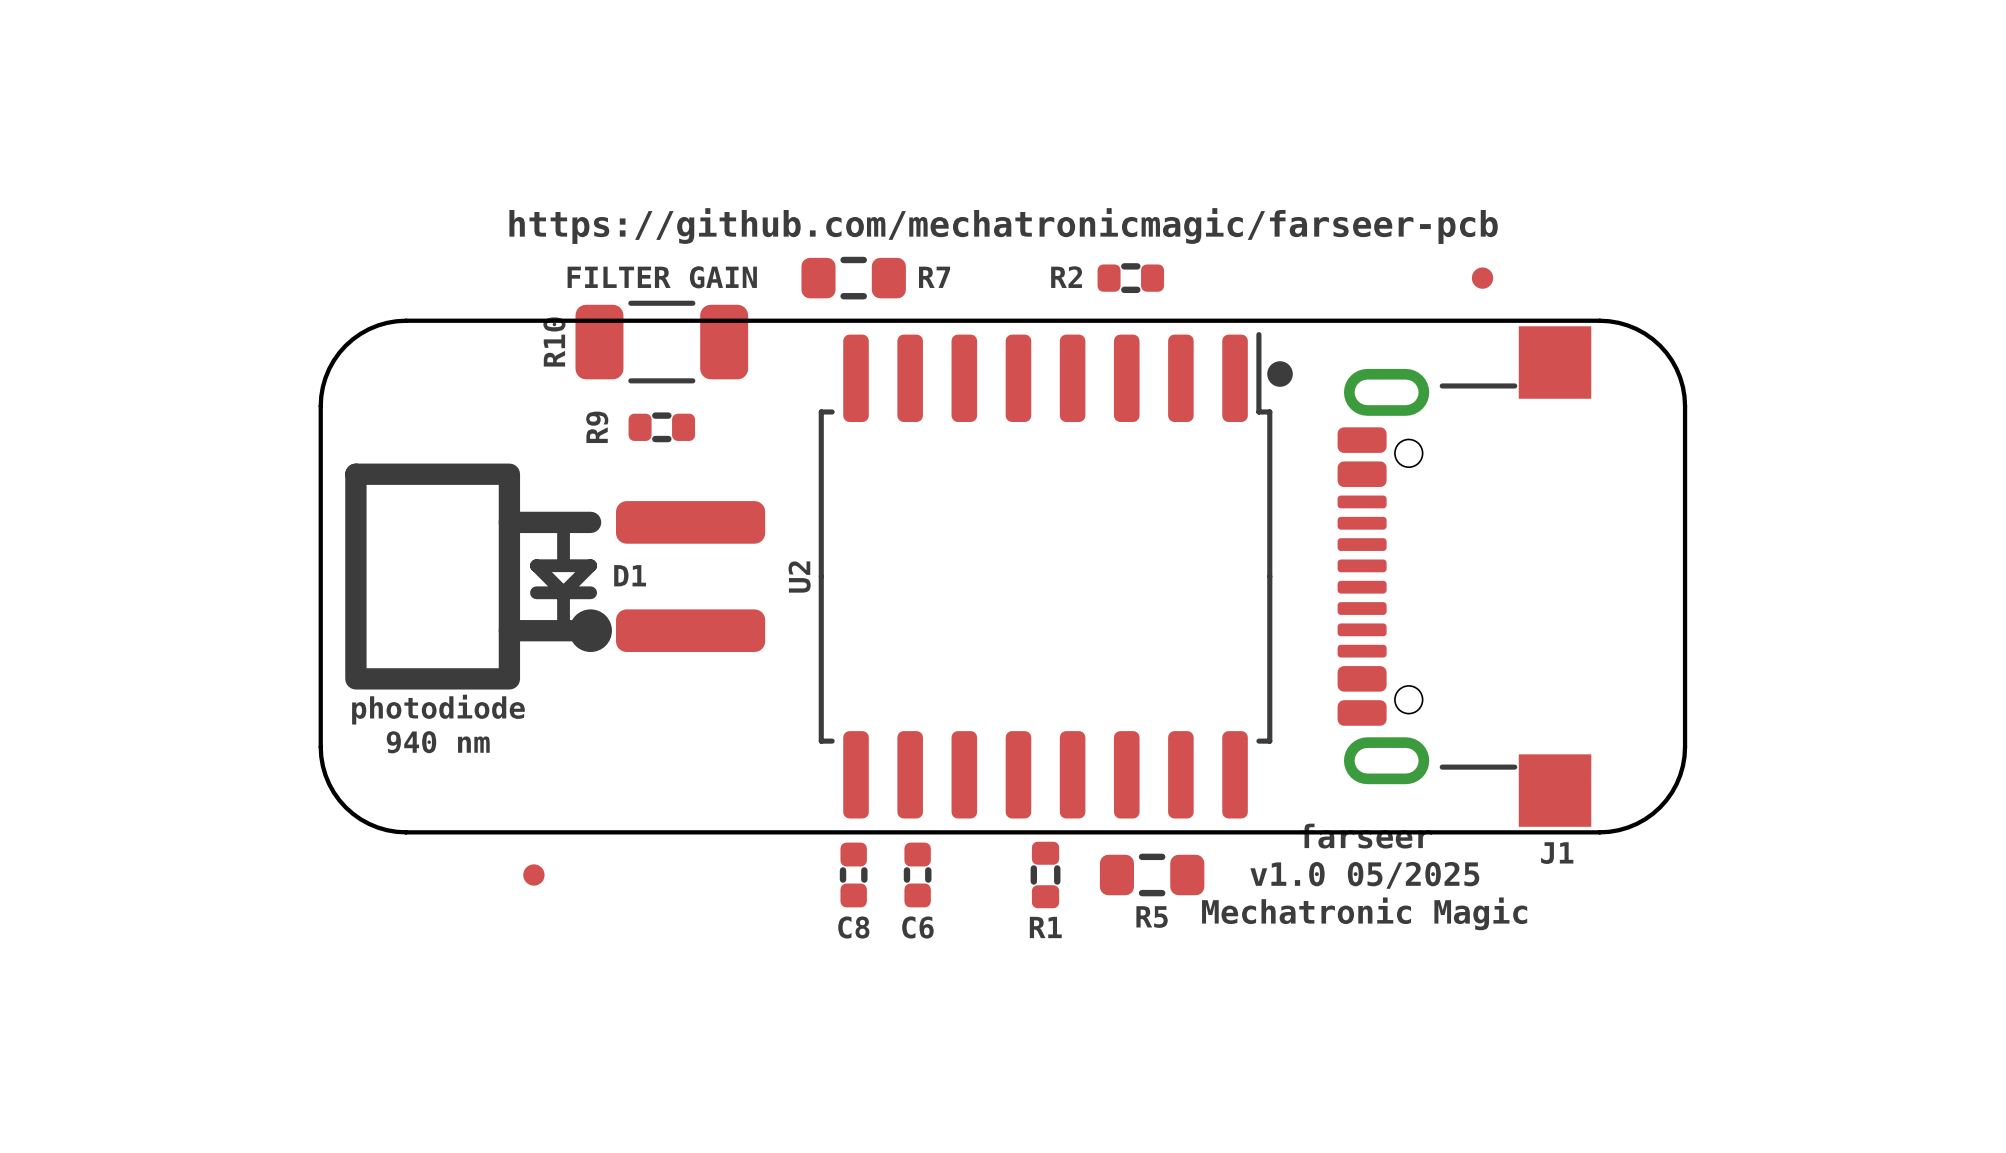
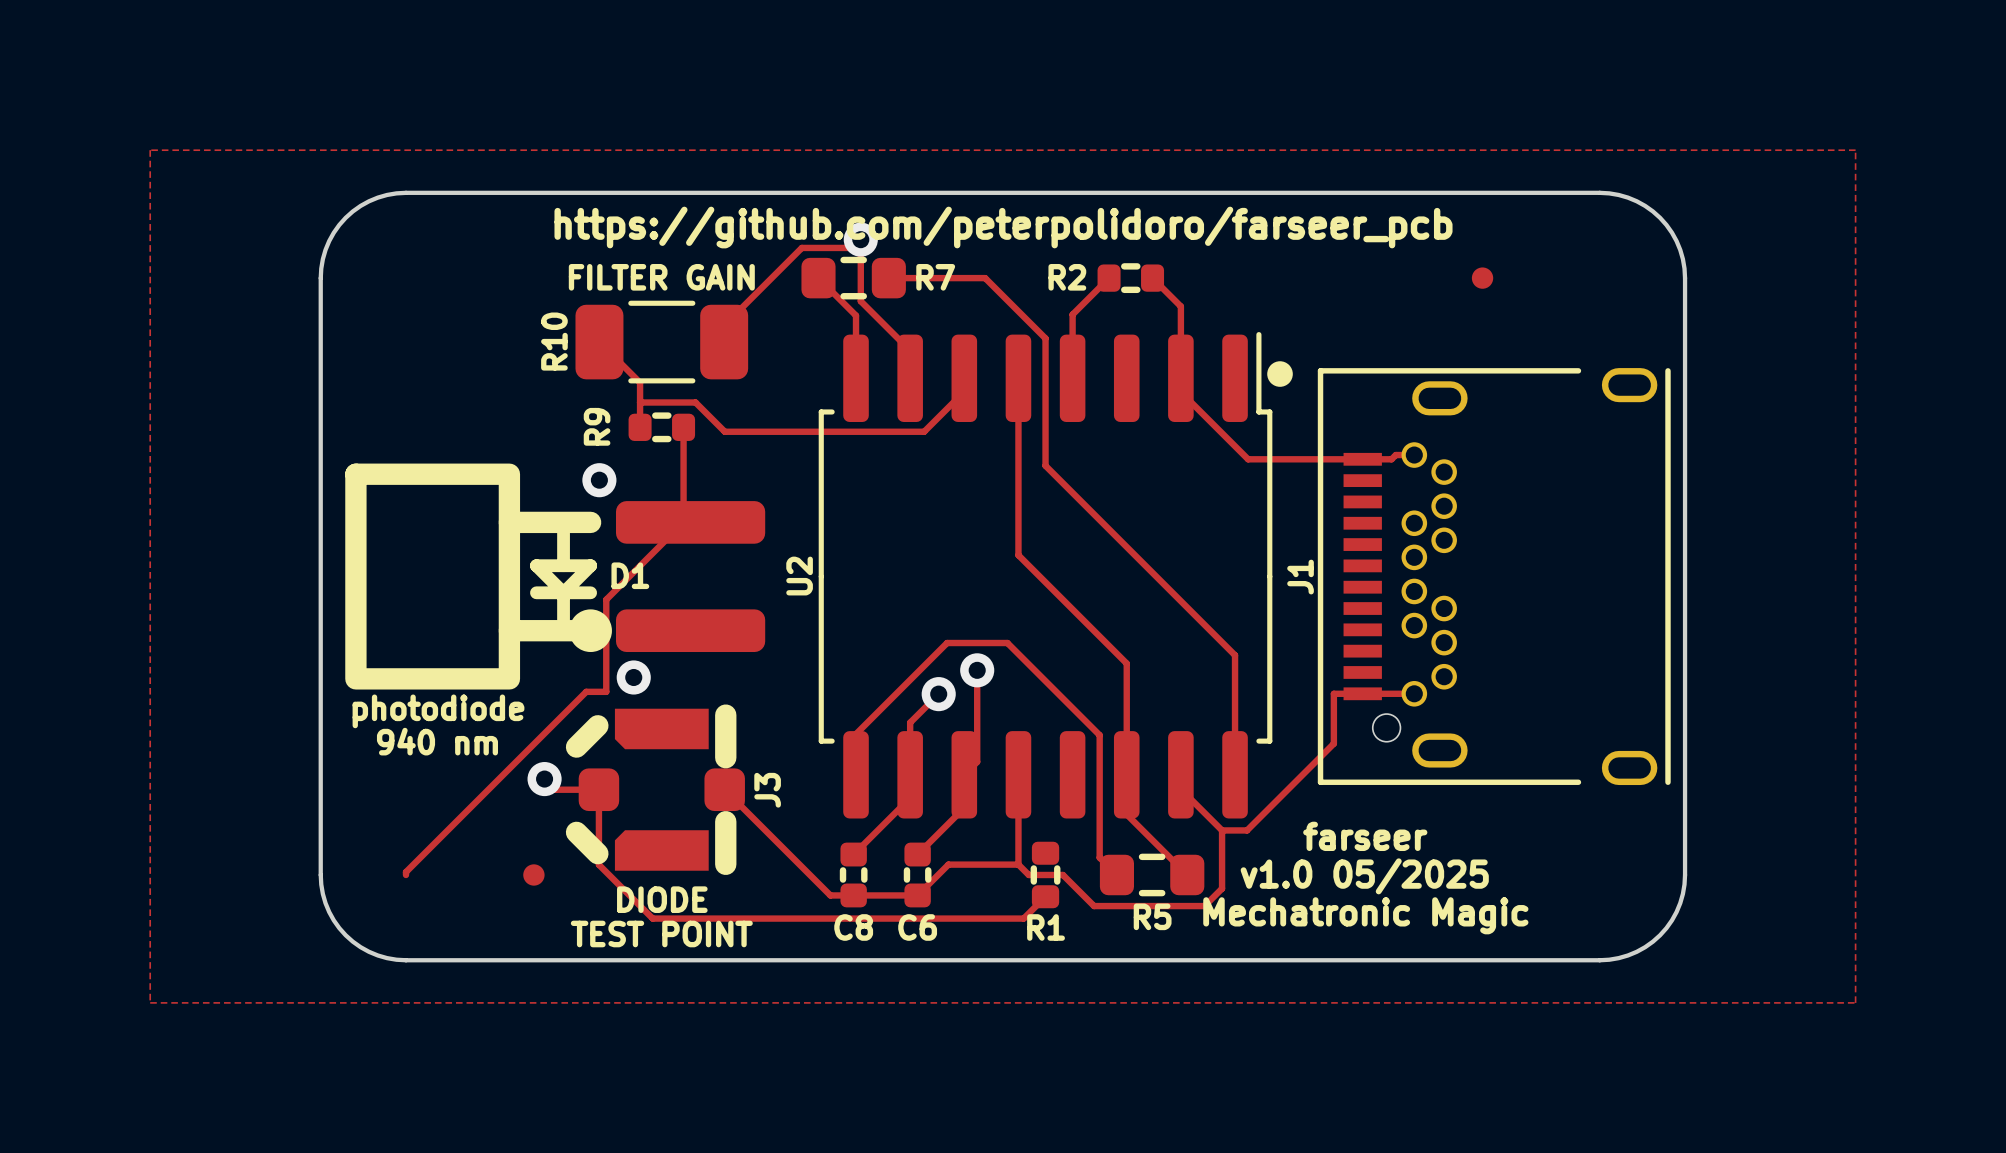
zone outline: none -> (150, 150) (150, 1002) (1855, 1002) (1855, 150) (150, 150)
text: https://github.com/mechatronicmagic/farseer-pcb (1003, 226) -> https://github.com/peterpolidoro/farseer_pcb (1003, 227)
track: none -> (860, 239) (860, 301) (910, 350) (910, 378)
via: none -> (860, 239)
track: none -> (860, 247) (801, 247) (724, 325) (724, 342)
track: none -> (818, 278) (856, 315) (856, 378)
track: none -> (888, 278) (985, 278) (1045, 338) (1045, 465) (1235, 655) (1235, 774)
track: none -> (1109, 278) (1072, 314) (1072, 378)
track: none -> (1152, 278) (1180, 306) (1180, 392) (1248, 459) (1391, 459) (1395, 455) (1414, 455)
J1 footprint: [1337, 326, 1592, 827] -> [1317, 368, 1671, 786]
track: none -> (599, 342) (640, 382) (640, 427)
track: none -> (964, 378) (964, 391) (924, 431) (724, 431) (695, 402) (640, 402)
track: none -> (1018, 378) (1018, 555) (1126, 663) (1126, 814) (1187, 874)
board edge: (320, 406) (325, 377) (333, 360) (345, 345) (369, 329) (387, 322) (406, 320) (1609, 321) (1636, 329) (1652, 339) (1666, 352) (1680, 377) (1685, 406) -> (320, 406) (320, 278) (325, 249) (333, 232) (352, 211) (377, 197) (406, 192) (1609, 193) (1636, 201) (1652, 211) (1666, 224) (1680, 249) (1685, 278) (1685, 406)
track: none -> (683, 427) (683, 522)
via: none -> (599, 480)
track: none -> (683, 522) (606, 599) (606, 691) (586, 691) (406, 872) (406, 874)
track: none -> (977, 670) (977, 761) (964, 774) (964, 807) (917, 854)
via: none -> (977, 670)
via: none -> (633, 677)
track: none -> (1414, 693) (1333, 693) (1333, 743) (1247, 830) (1222, 830)
track: none -> (938, 694) (910, 722) (910, 798) (853, 854)
via: none -> (938, 694)
board edge: (320, 747) (325, 775) (333, 792) (345, 807) (369, 823) (387, 830) (406, 832) (1609, 831) (1636, 823) (1652, 813) (1666, 800) (1680, 775) (1685, 747) -> (320, 747) (320, 874) (325, 903) (339, 928) (360, 947) (377, 955) (406, 960) (1609, 959) (1636, 951) (1652, 941) (1666, 928) (1680, 903) (1685, 874) (1685, 747)
track: none -> (856, 774) (856, 734) (947, 643) (1007, 643) (1099, 735) (1099, 857) (1116, 874)
track: none -> (1018, 774) (1018, 864)
track: none -> (1180, 774) (1180, 789) (1222, 830)
track: none -> (544, 779) (555, 789) (598, 789) (598, 864) (652, 918) (1023, 918) (1045, 896)
via: none -> (544, 779)
J3: none -> (655, 789)
track: none -> (722, 789) (830, 895) (917, 895) (948, 864) (1018, 864)
track: none -> (1222, 830) (1222, 888) (1204, 906) (1094, 906) (1062, 874) (1028, 874) (1018, 864)
J1 name position: J1 (1557, 853) -> J1 (1300, 577)
text: none -> DIODE (662, 899)
text: none -> TEST POINT (661, 933)

